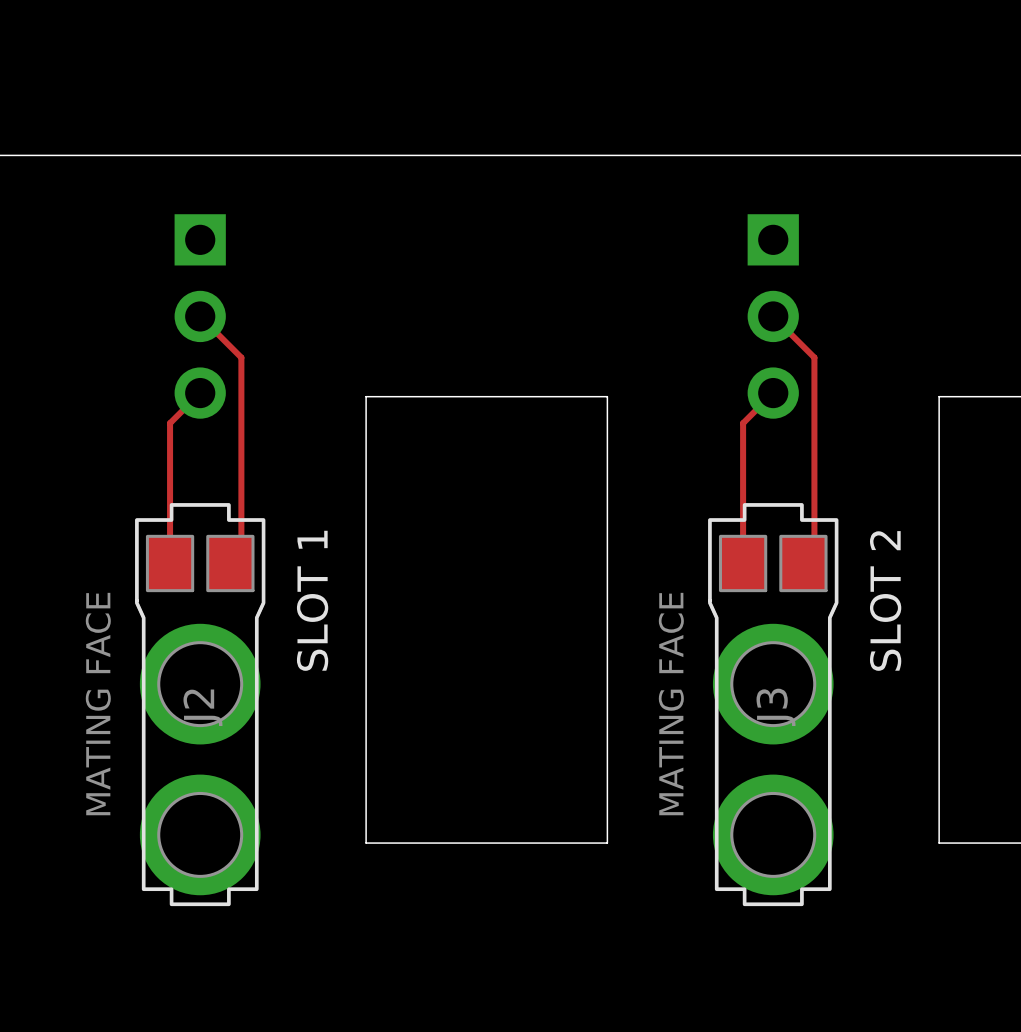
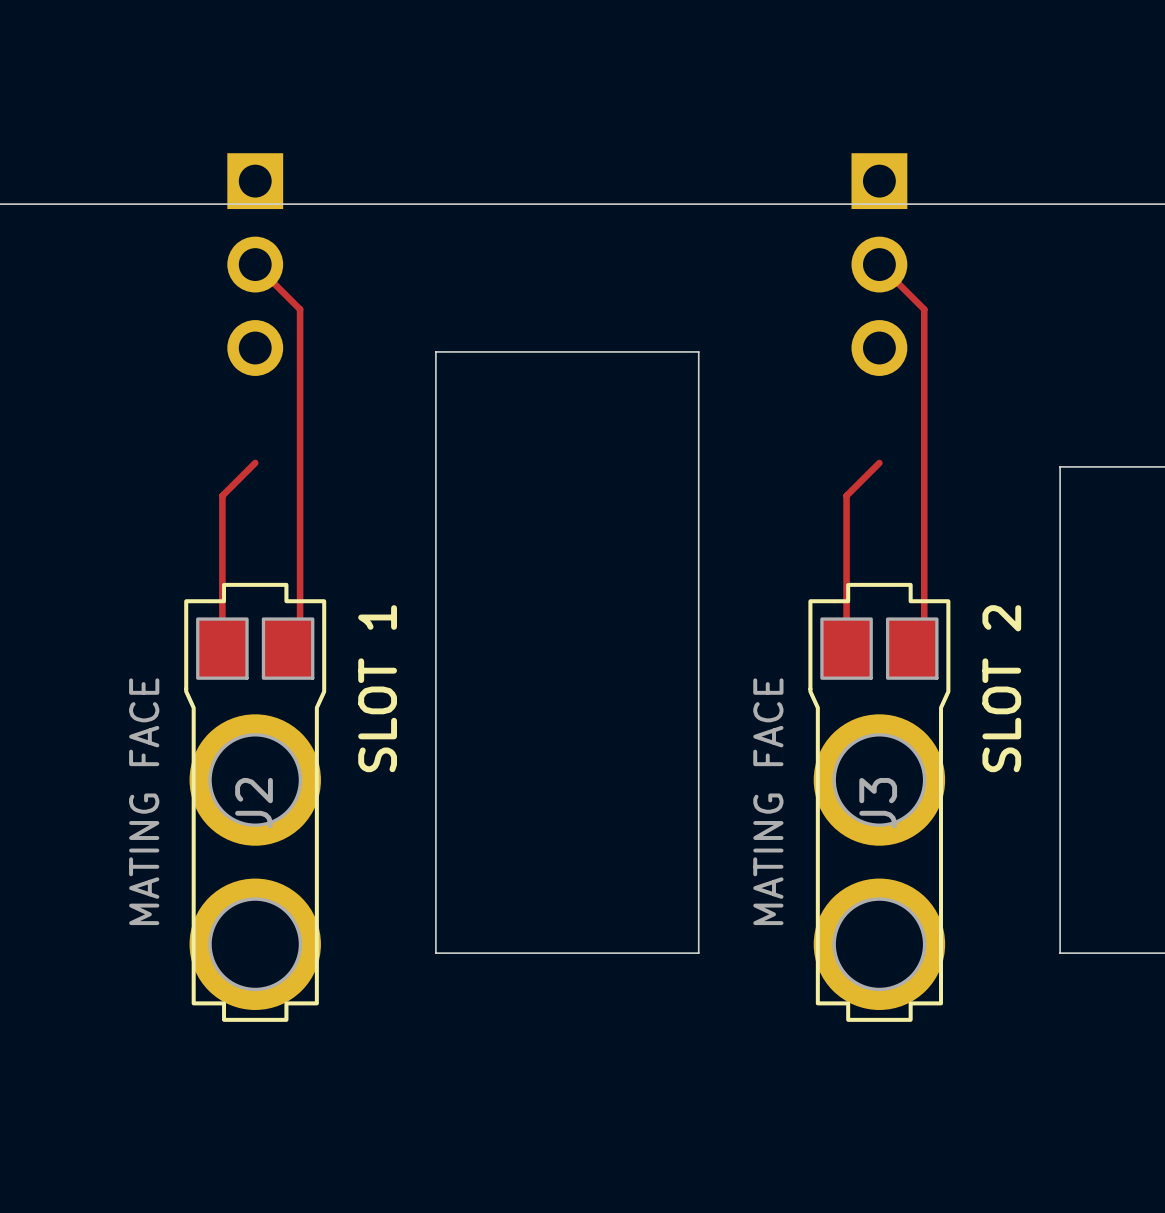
track: (200, 316) (241, 357) -> (255, 264) (300, 309) (300, 424)
part position: (200, 316) -> (255, 264)
track: (773, 316) (814, 357) -> (879, 264) (924, 309) (924, 424)
part position: (773, 316) -> (879, 264)
board edge: (366, 396) (607, 396) -> (435, 466) (435, 351) (698, 351) (698, 466)

